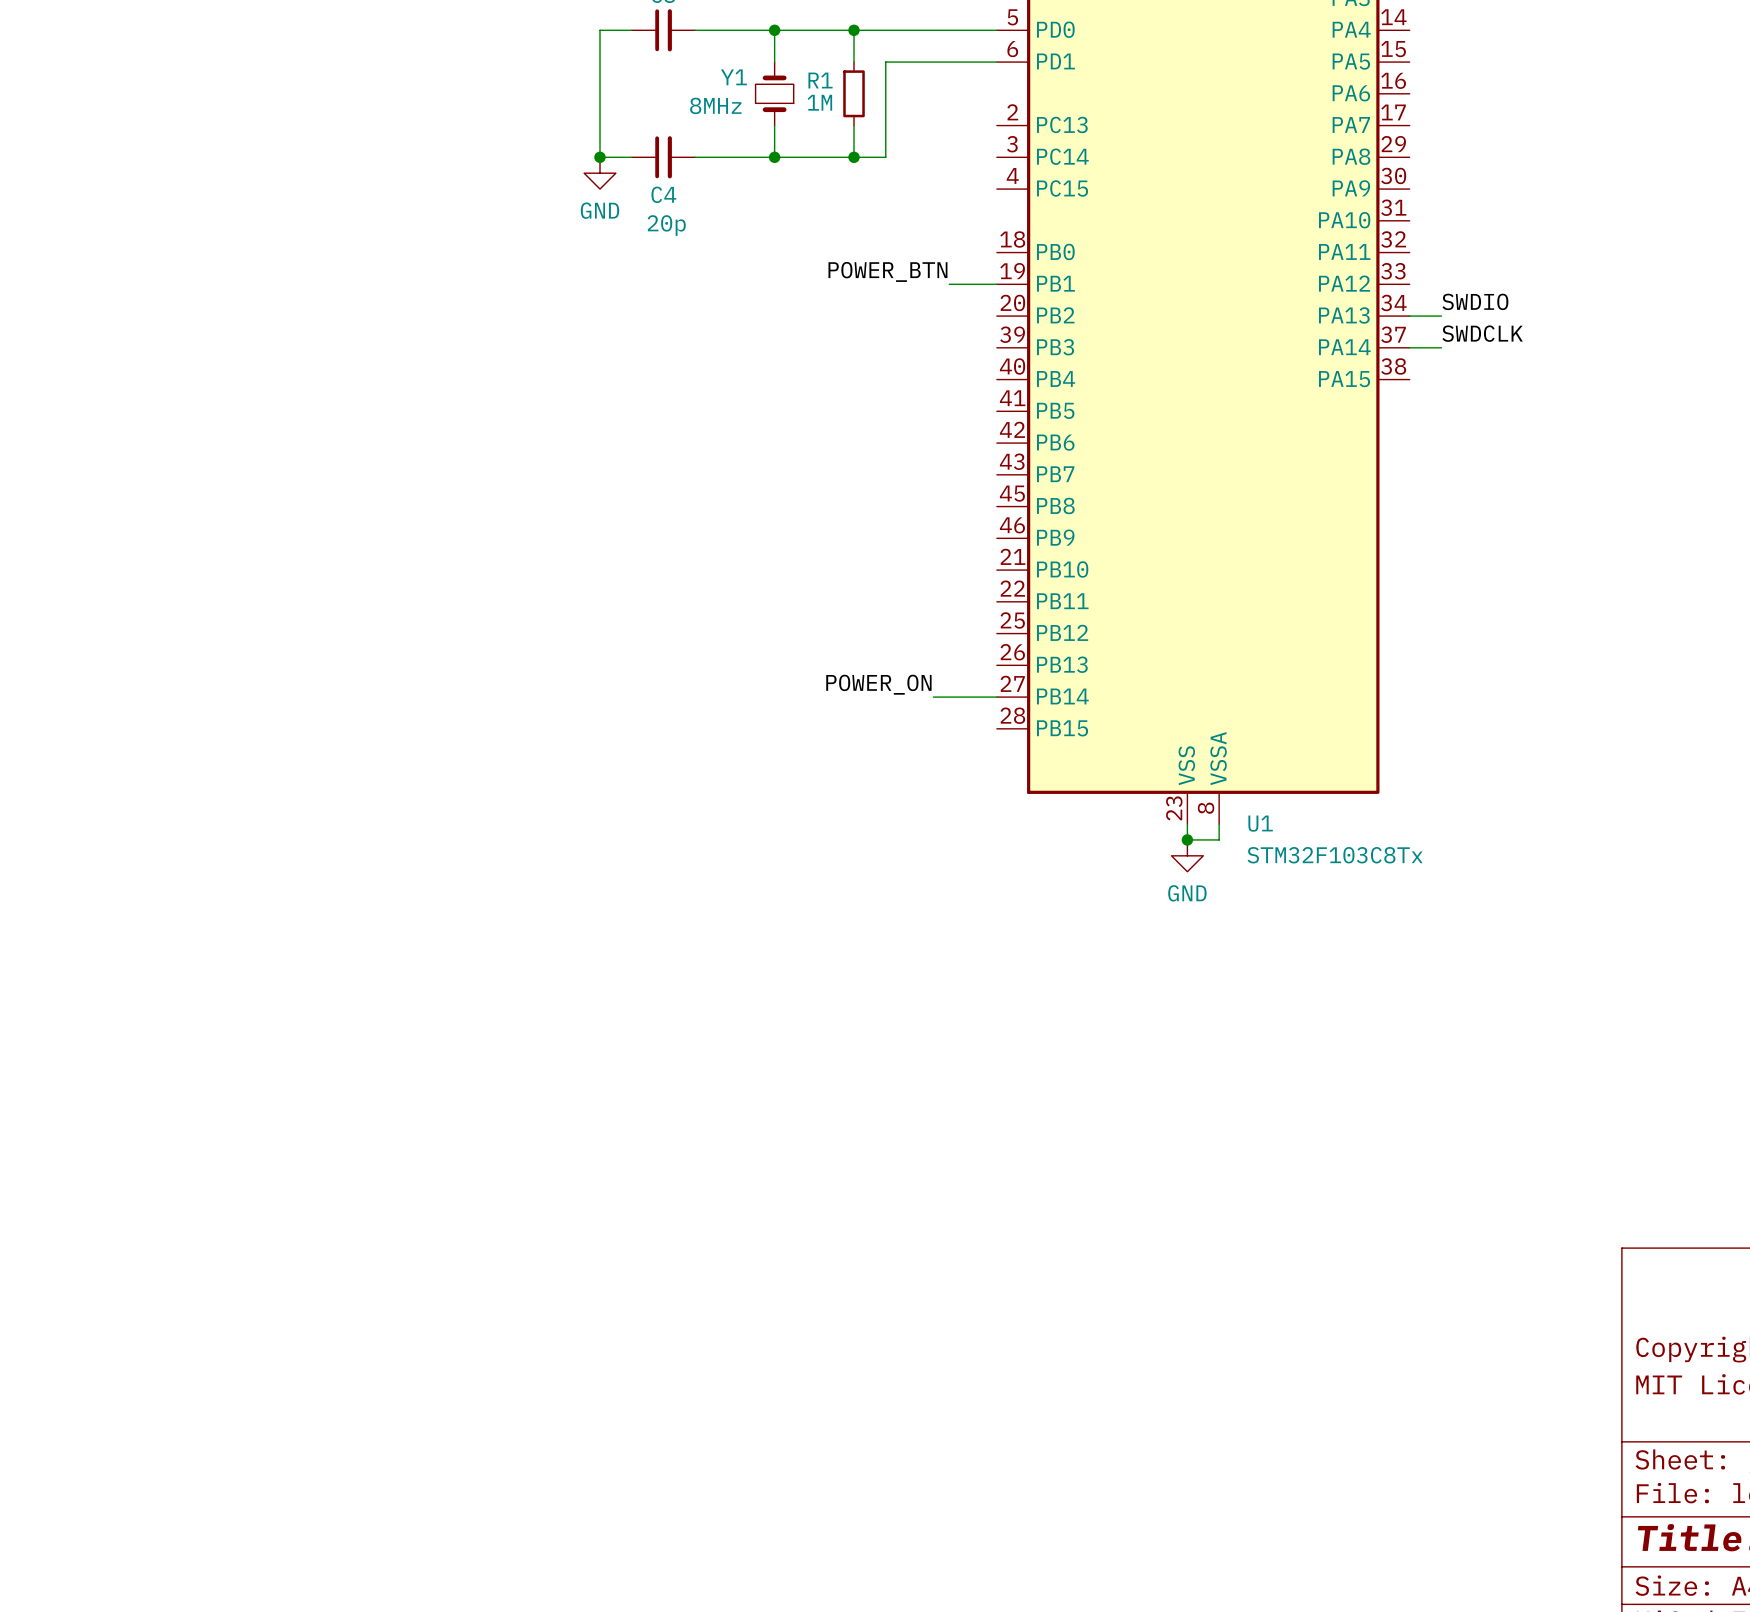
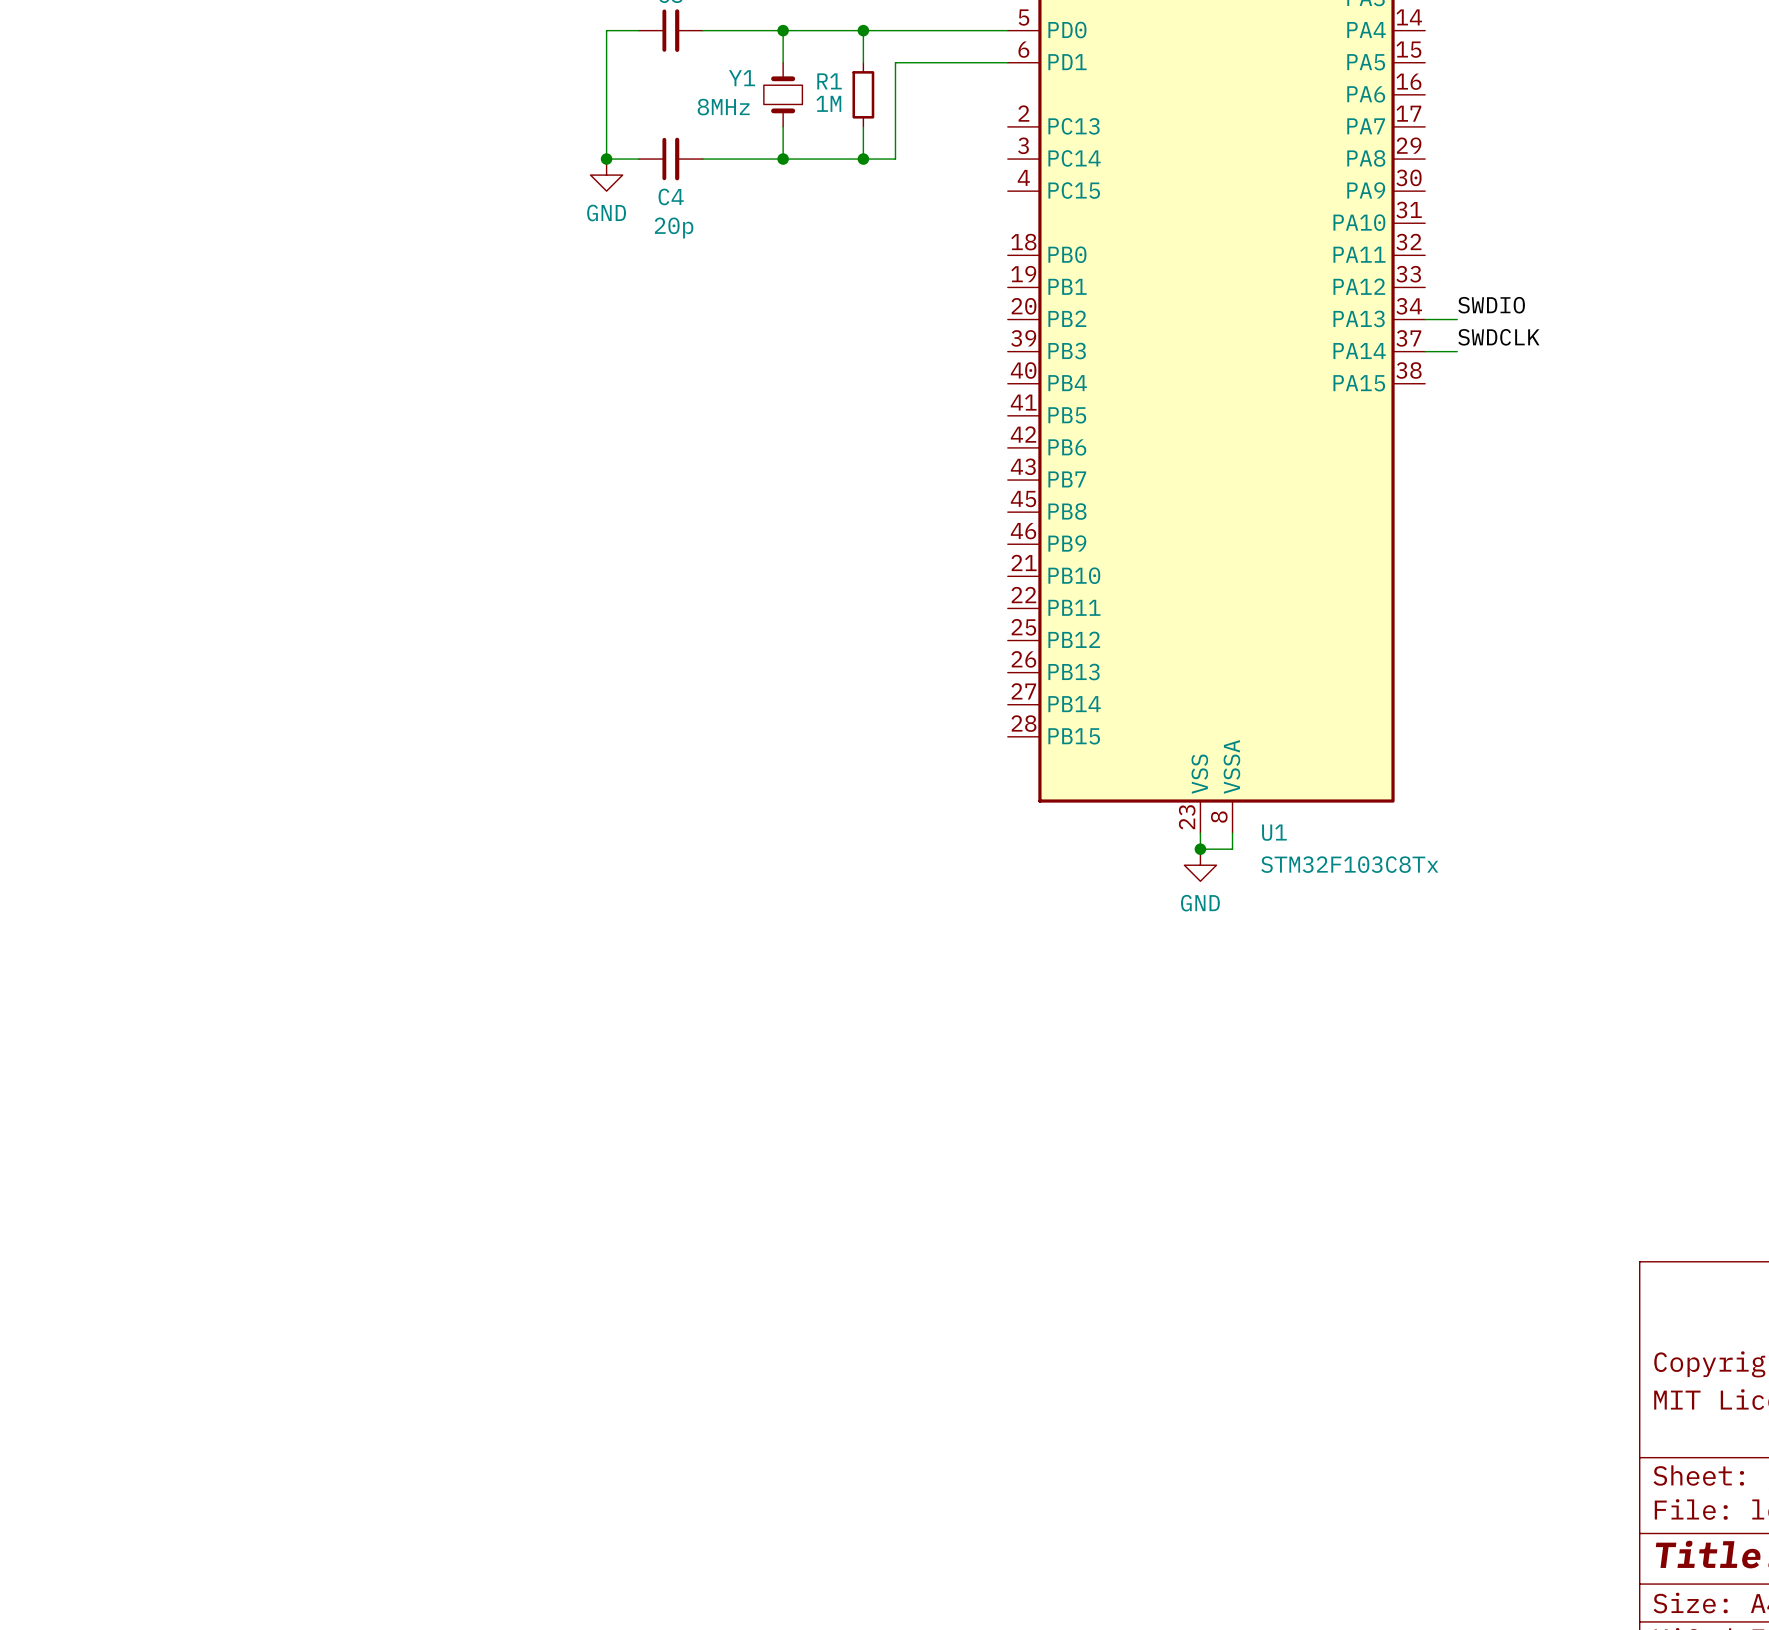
label: POWER_BTN (887, 271) -> none
wire: (949, 284) (996, 284) -> none
label: POWER_ON (878, 684) -> none
wire: (933, 697) (996, 697) -> none

